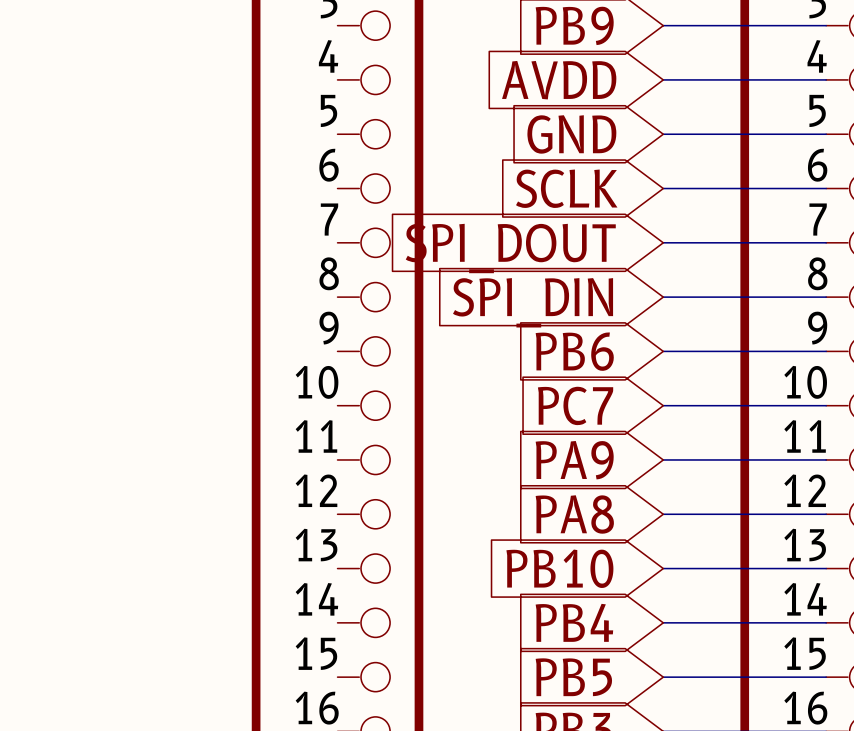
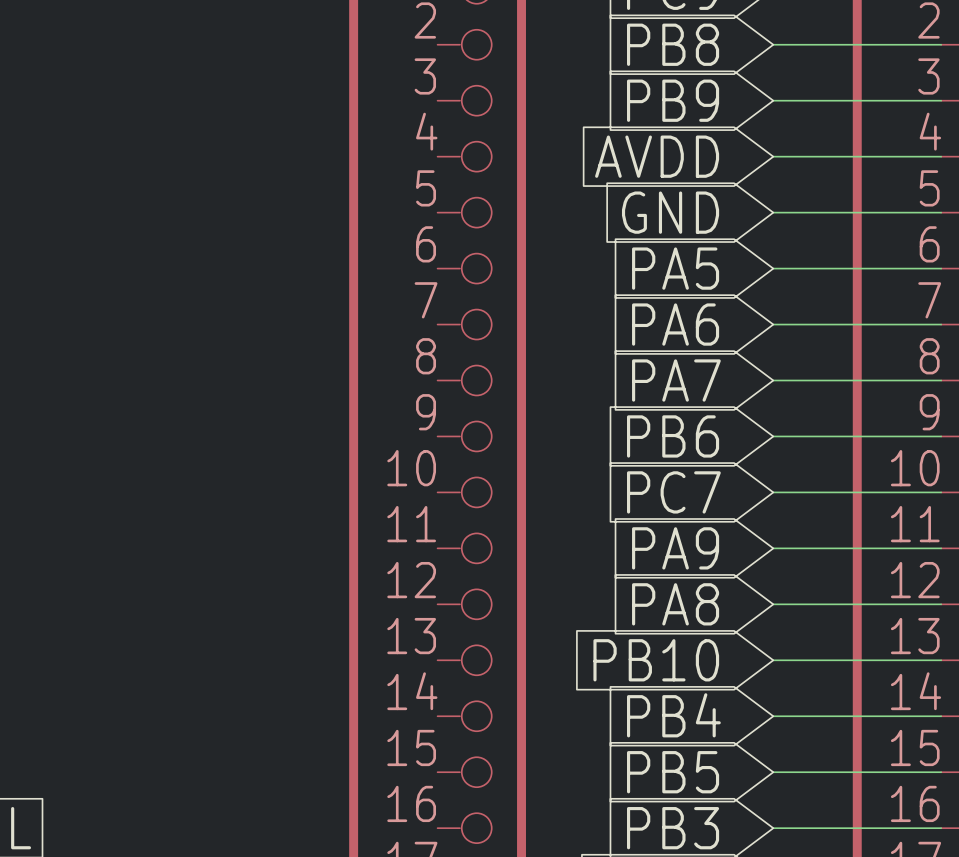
global label: SCLK (566, 188) -> PA5 (675, 268)
global label: SPI_DOUT (510, 248) -> PA6 (675, 324)
global label: SPI_DIN (533, 302) -> PA7 (676, 380)

